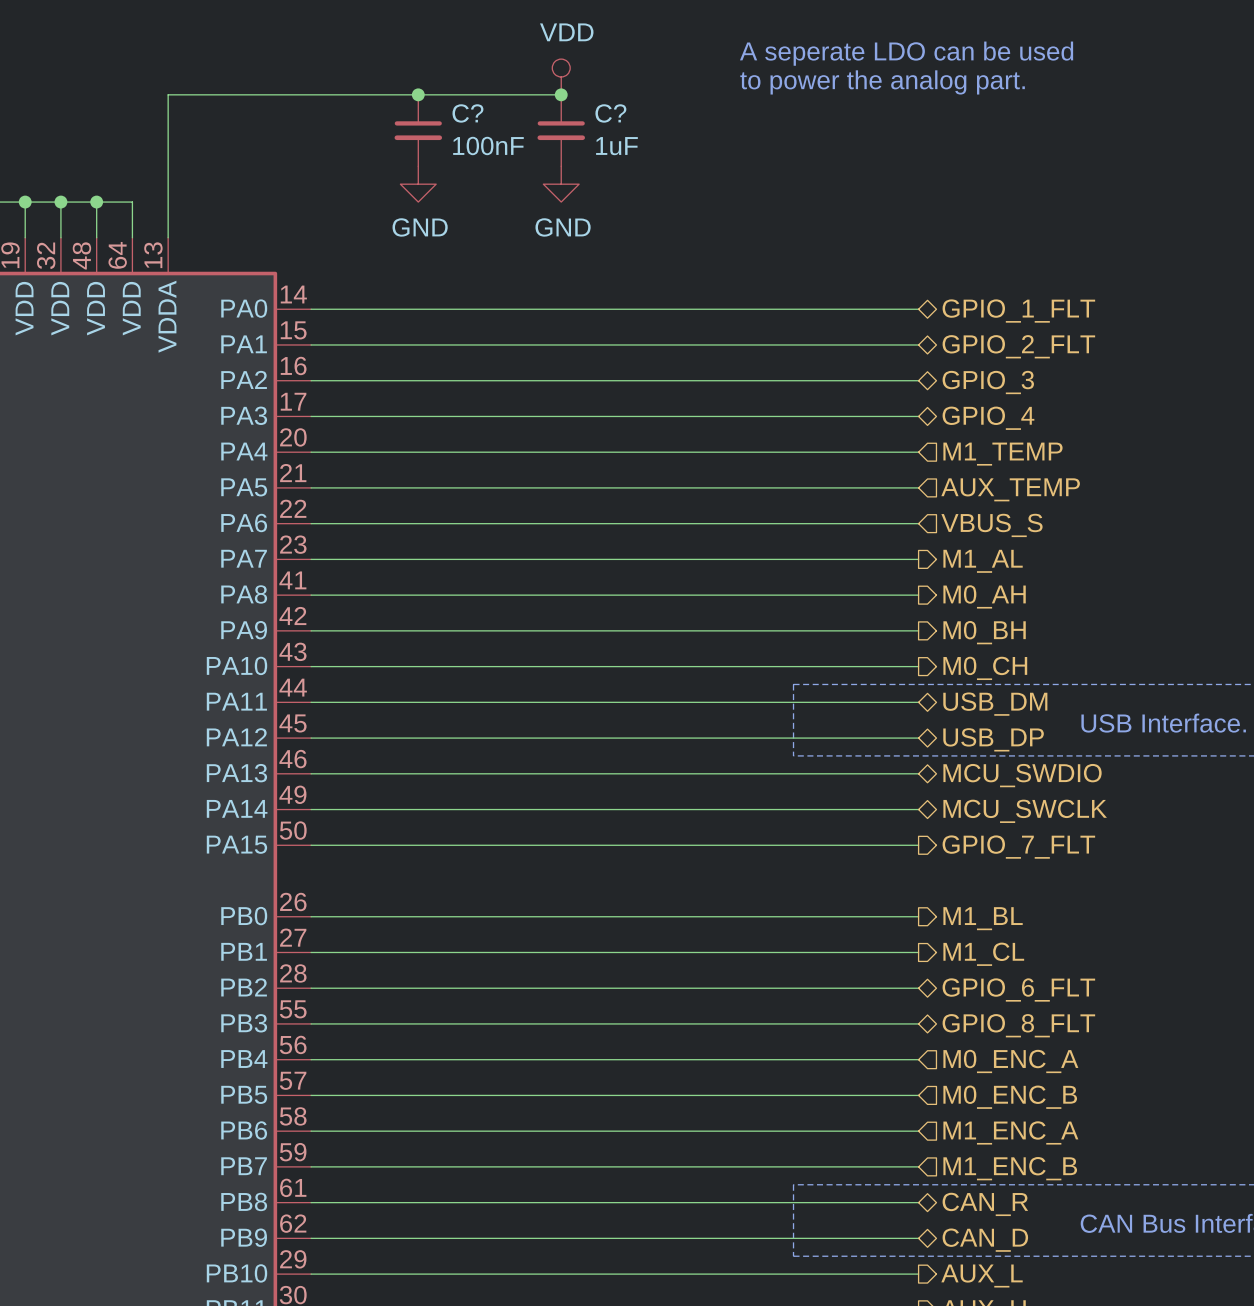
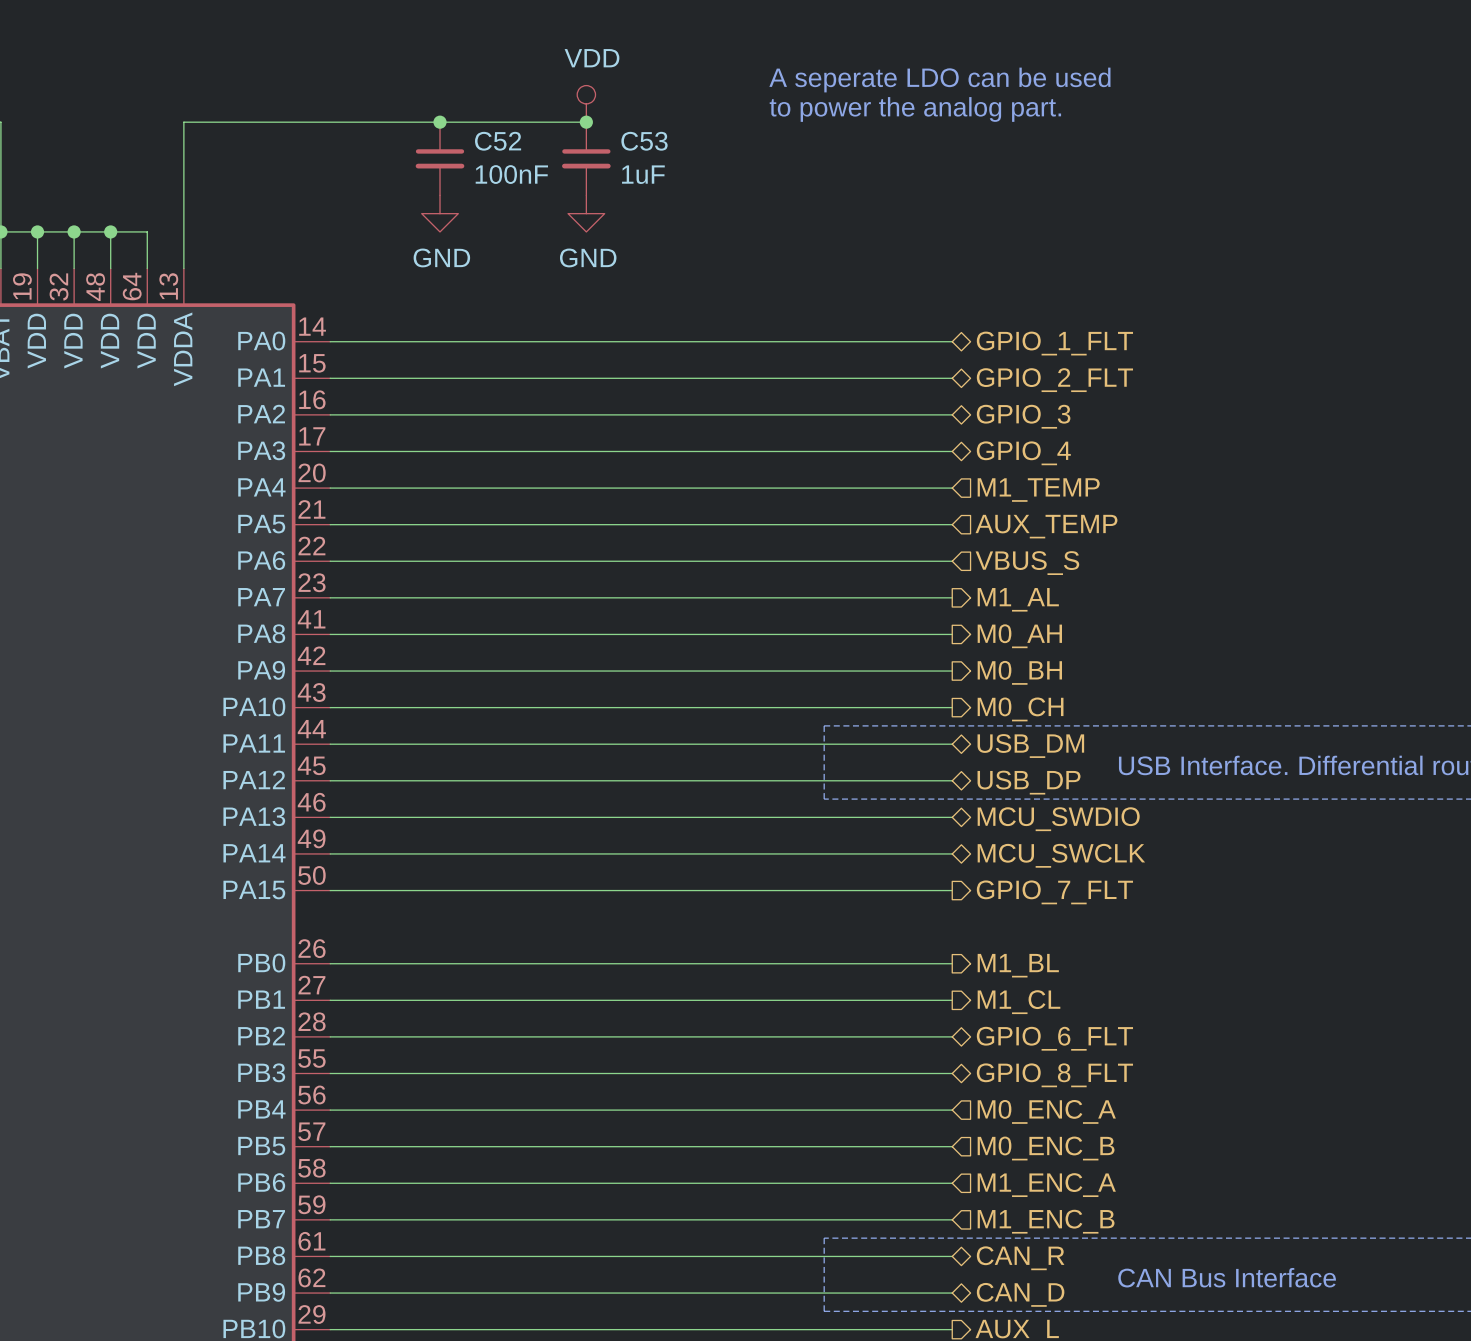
C? name: C? (467, 113) -> C52 (498, 141)
C? name: C? (610, 113) -> C53 (644, 141)

